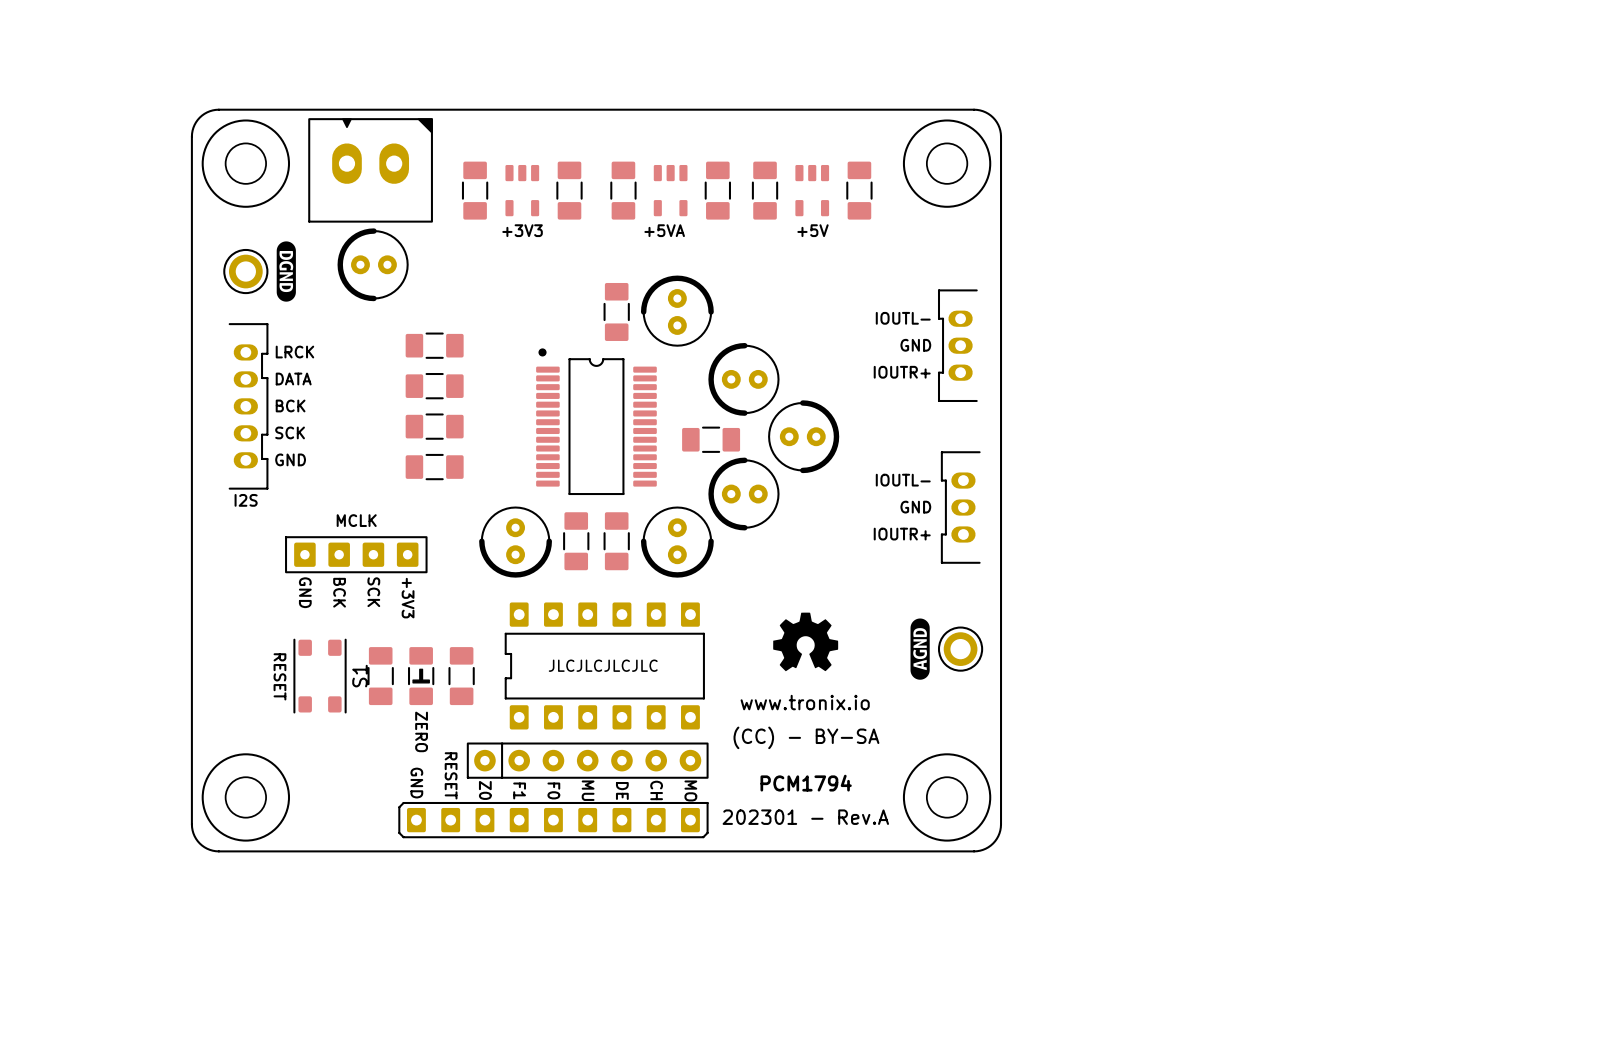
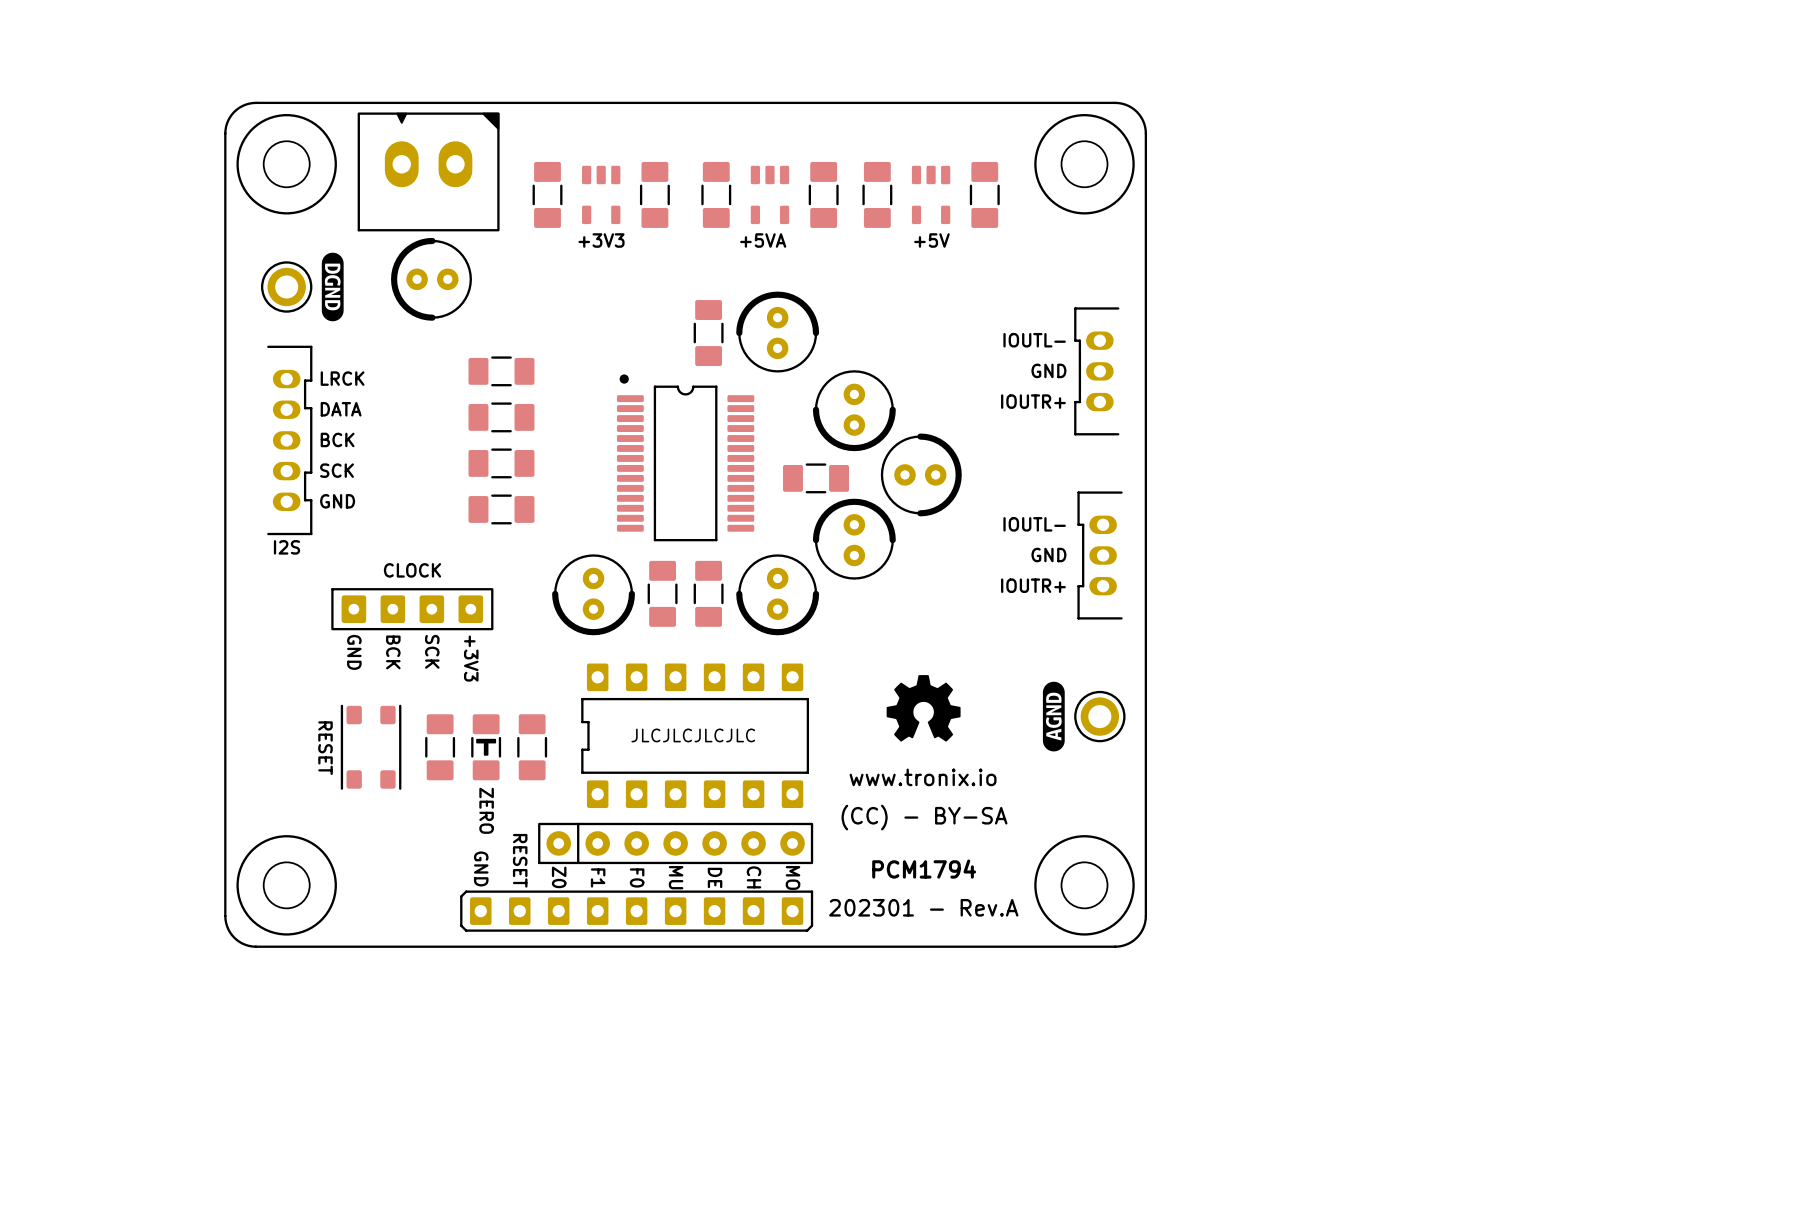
part rotation: 0° (743, 379) -> 90° counterclockwise (854, 410)
part rotation: 0° (743, 494) -> 90° clockwise (854, 539)
text: MCLK (356, 520) -> CLOCK (412, 570)
S1 name: S1 (359, 676) -> none
part rotation: 0° (421, 676) -> 180° (486, 747)

